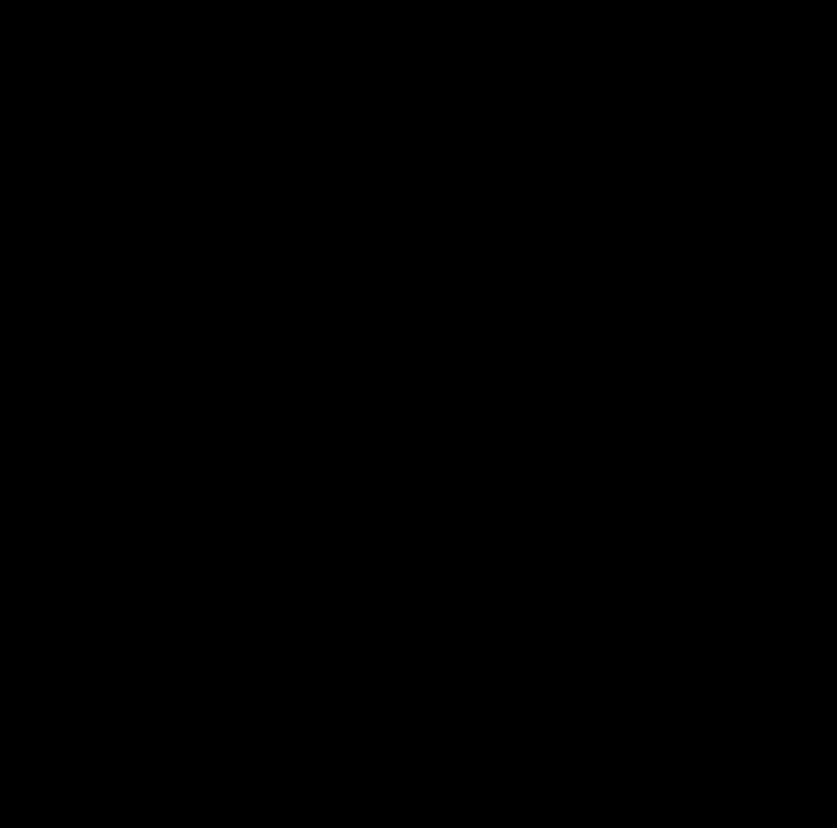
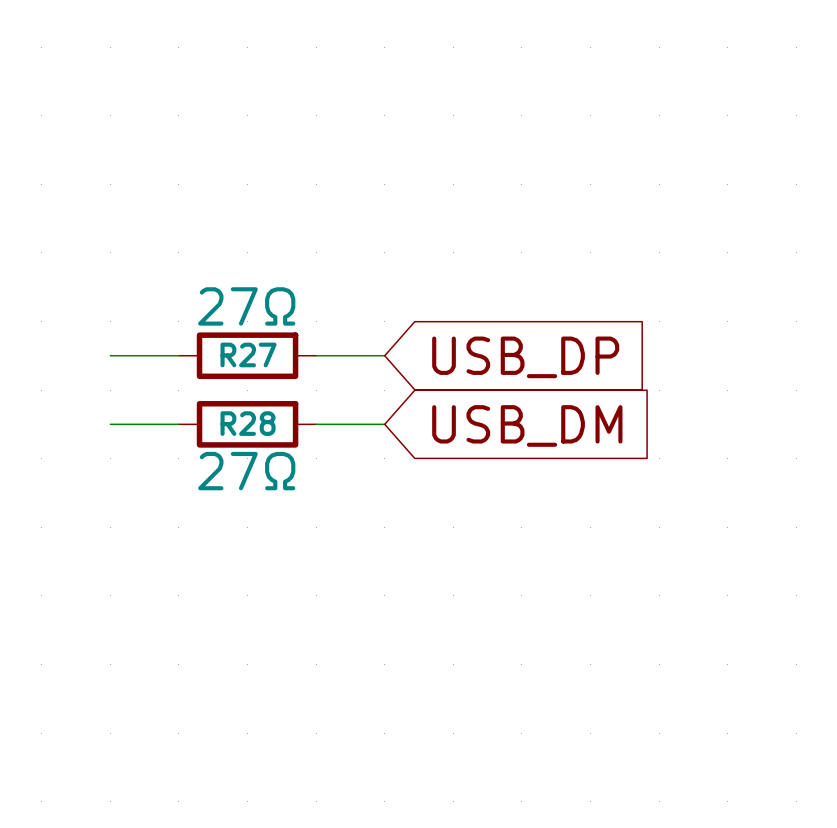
wire: none -> (110, 355) (178, 355)
R27: none -> 27Ω (247, 355)
wire: none -> (316, 355) (384, 355)
global label: none -> USB_DP (525, 357)
wire: none -> (110, 424) (178, 424)
R28: none -> 27Ω (247, 424)
wire: none -> (316, 424) (384, 424)
global label: none -> USB_DM (527, 425)

